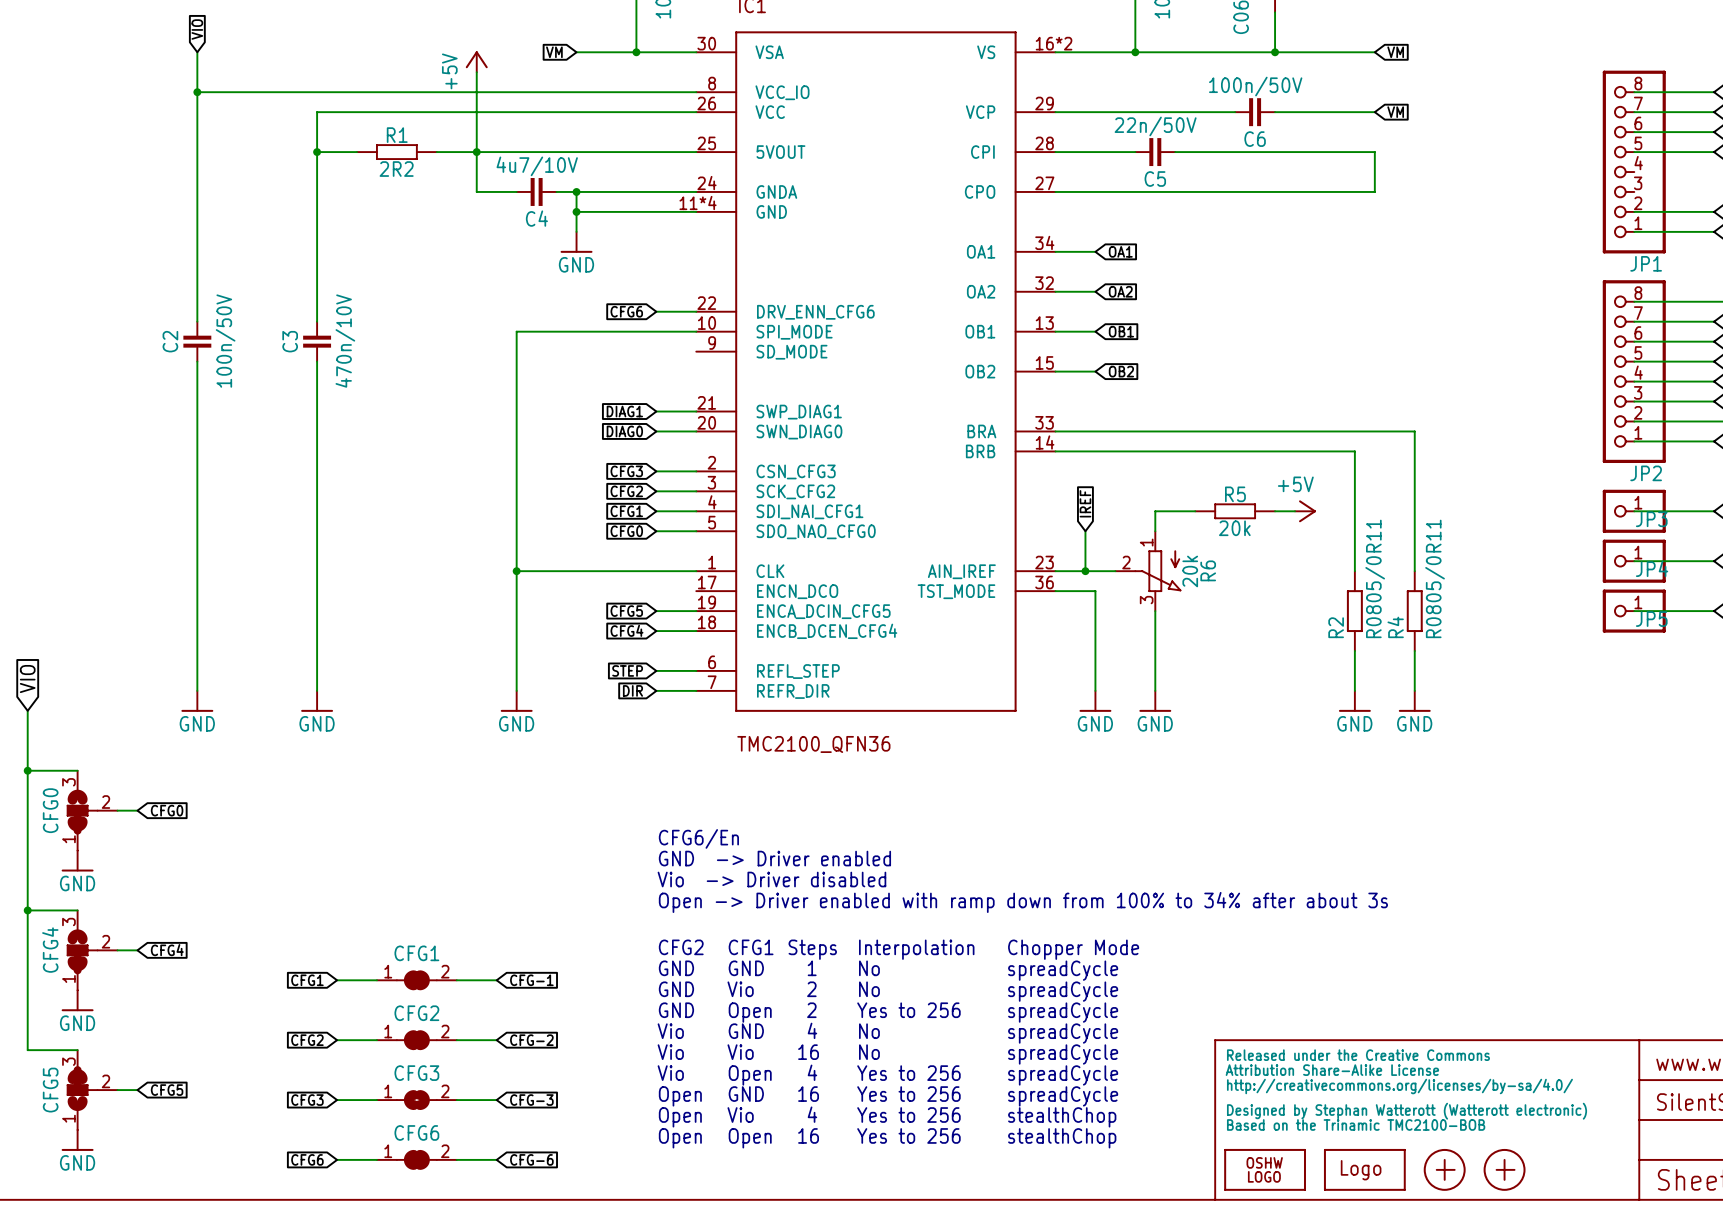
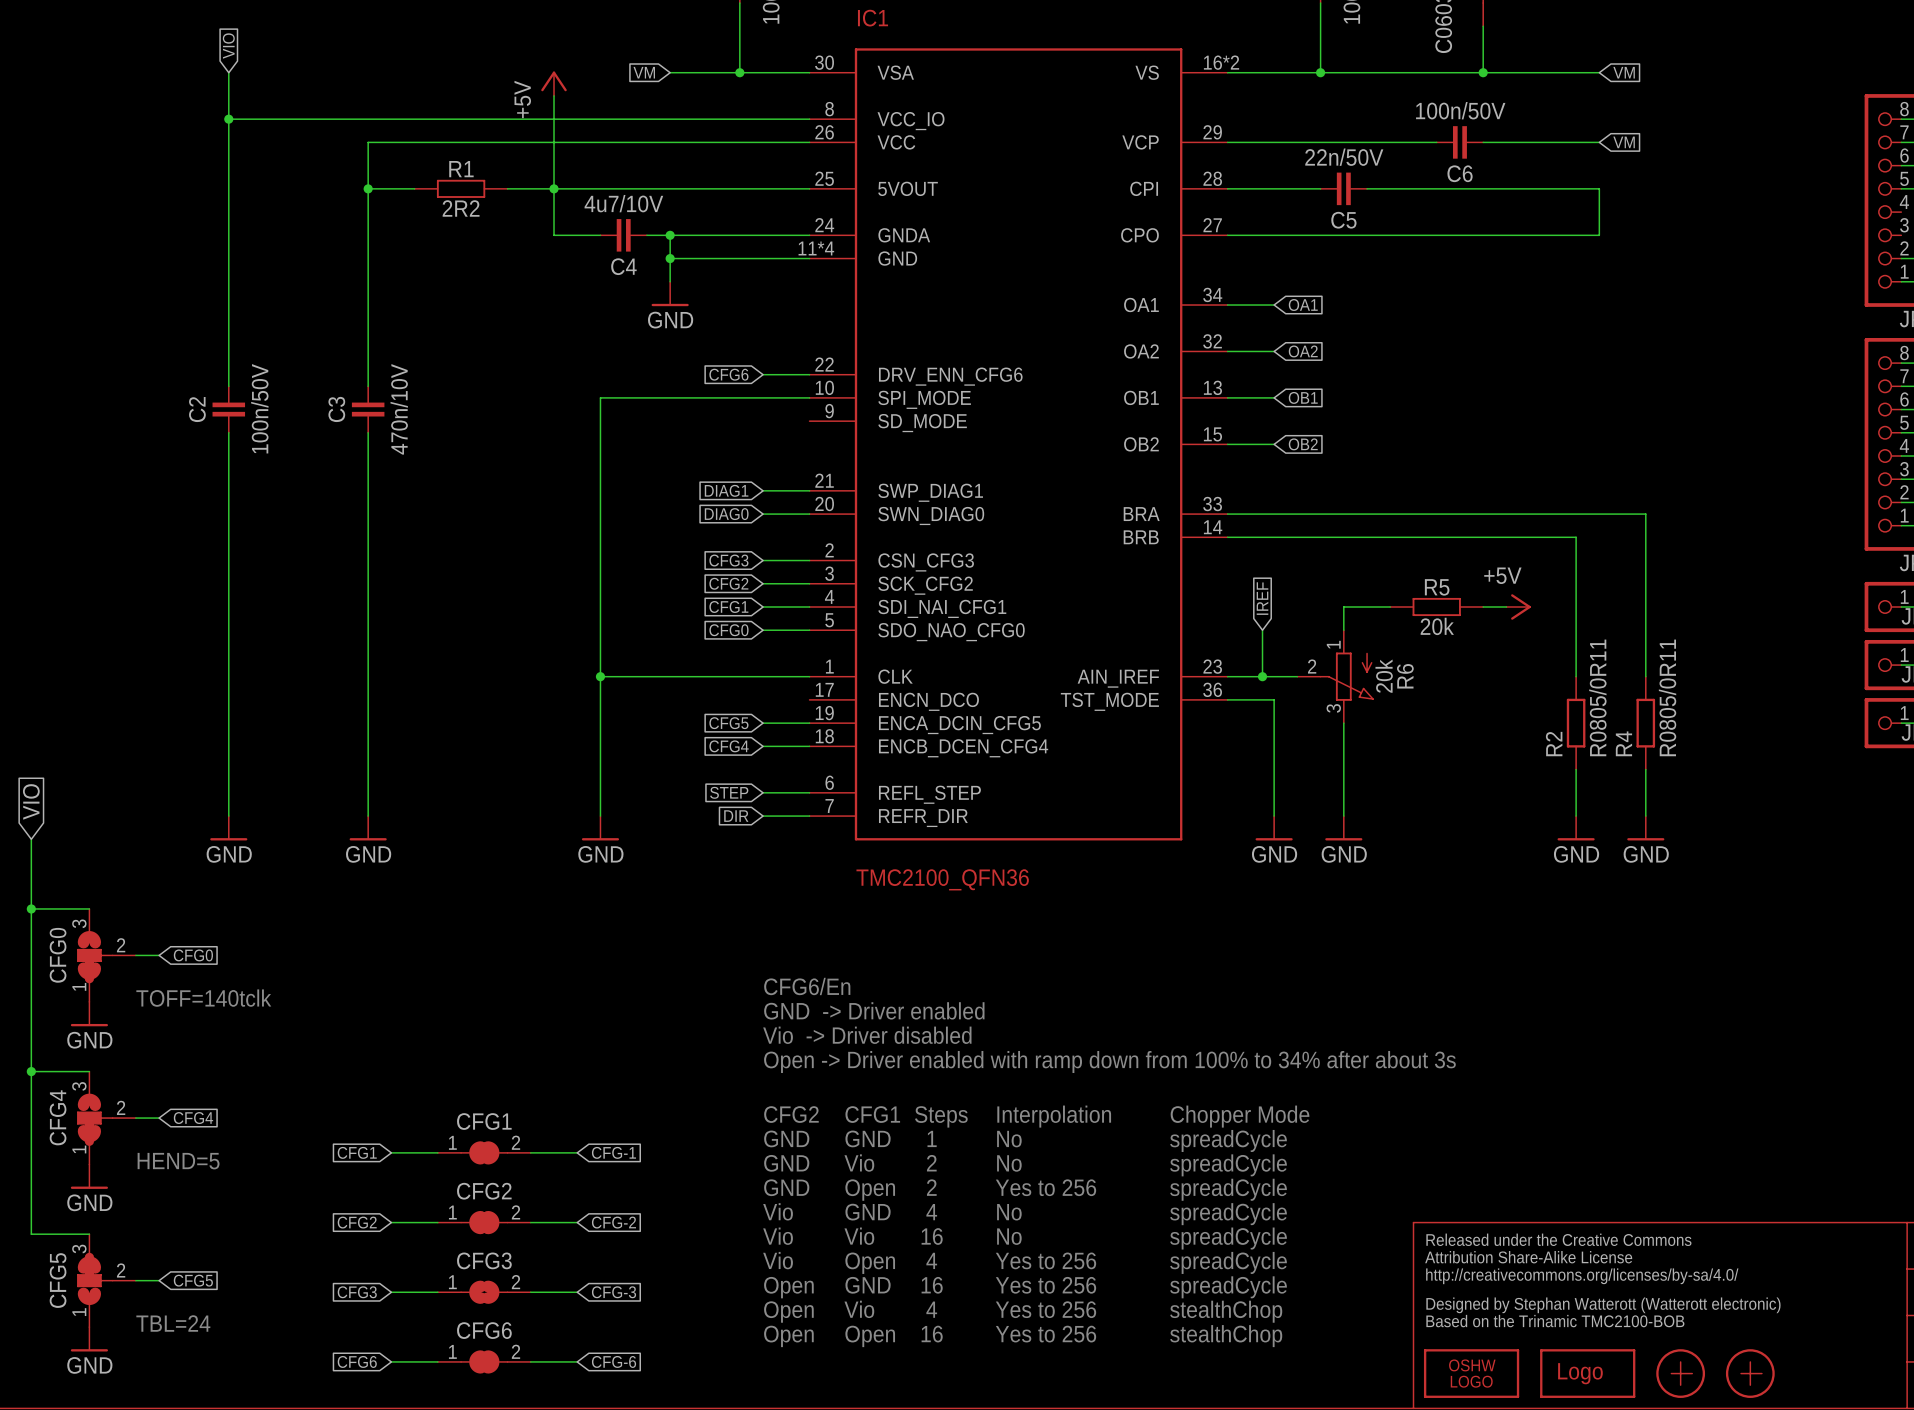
text: none -> TOFF=140tclk (203, 998)
text: none -> HEND=5 (178, 1161)
text: none -> TBL=24 (173, 1323)

